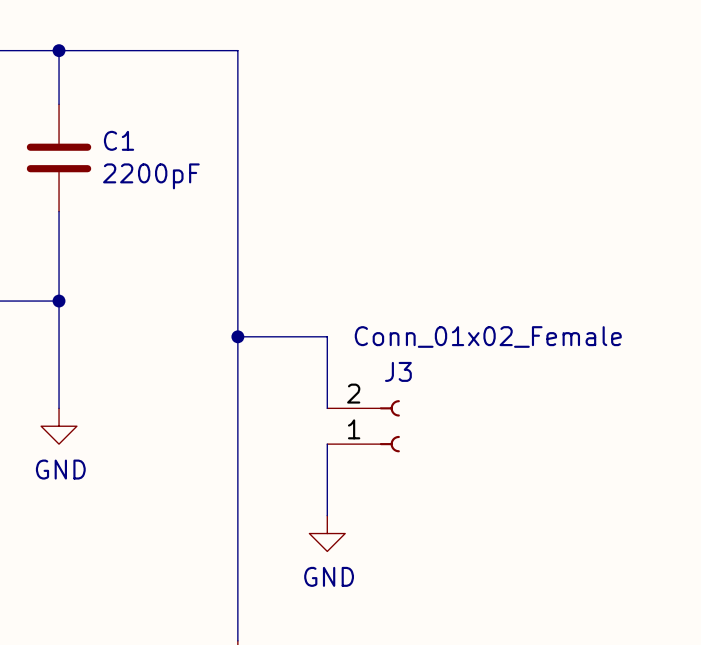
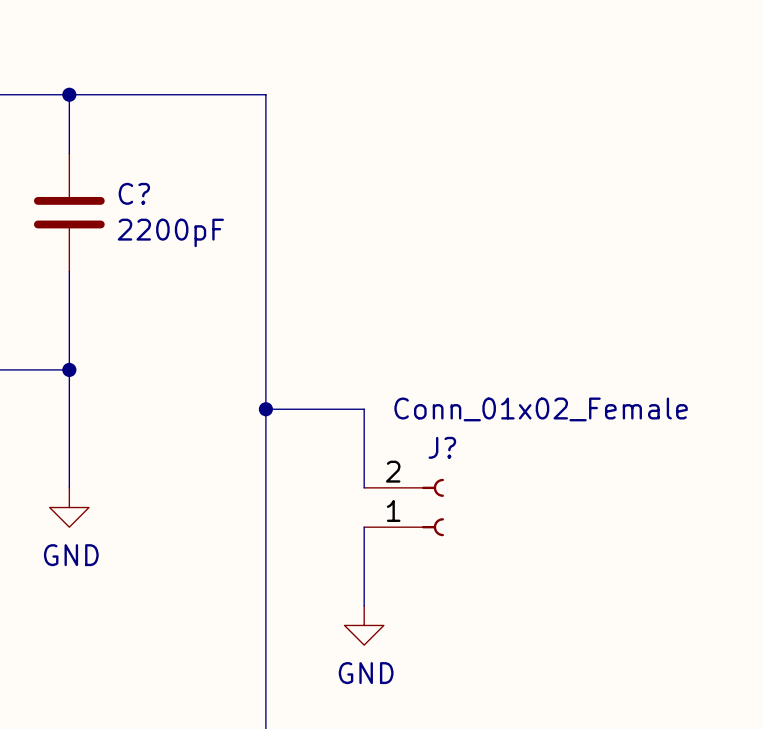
C1 name: C1 (119, 140) -> C? (134, 193)
J3 name: J3 (398, 371) -> J? (442, 447)

